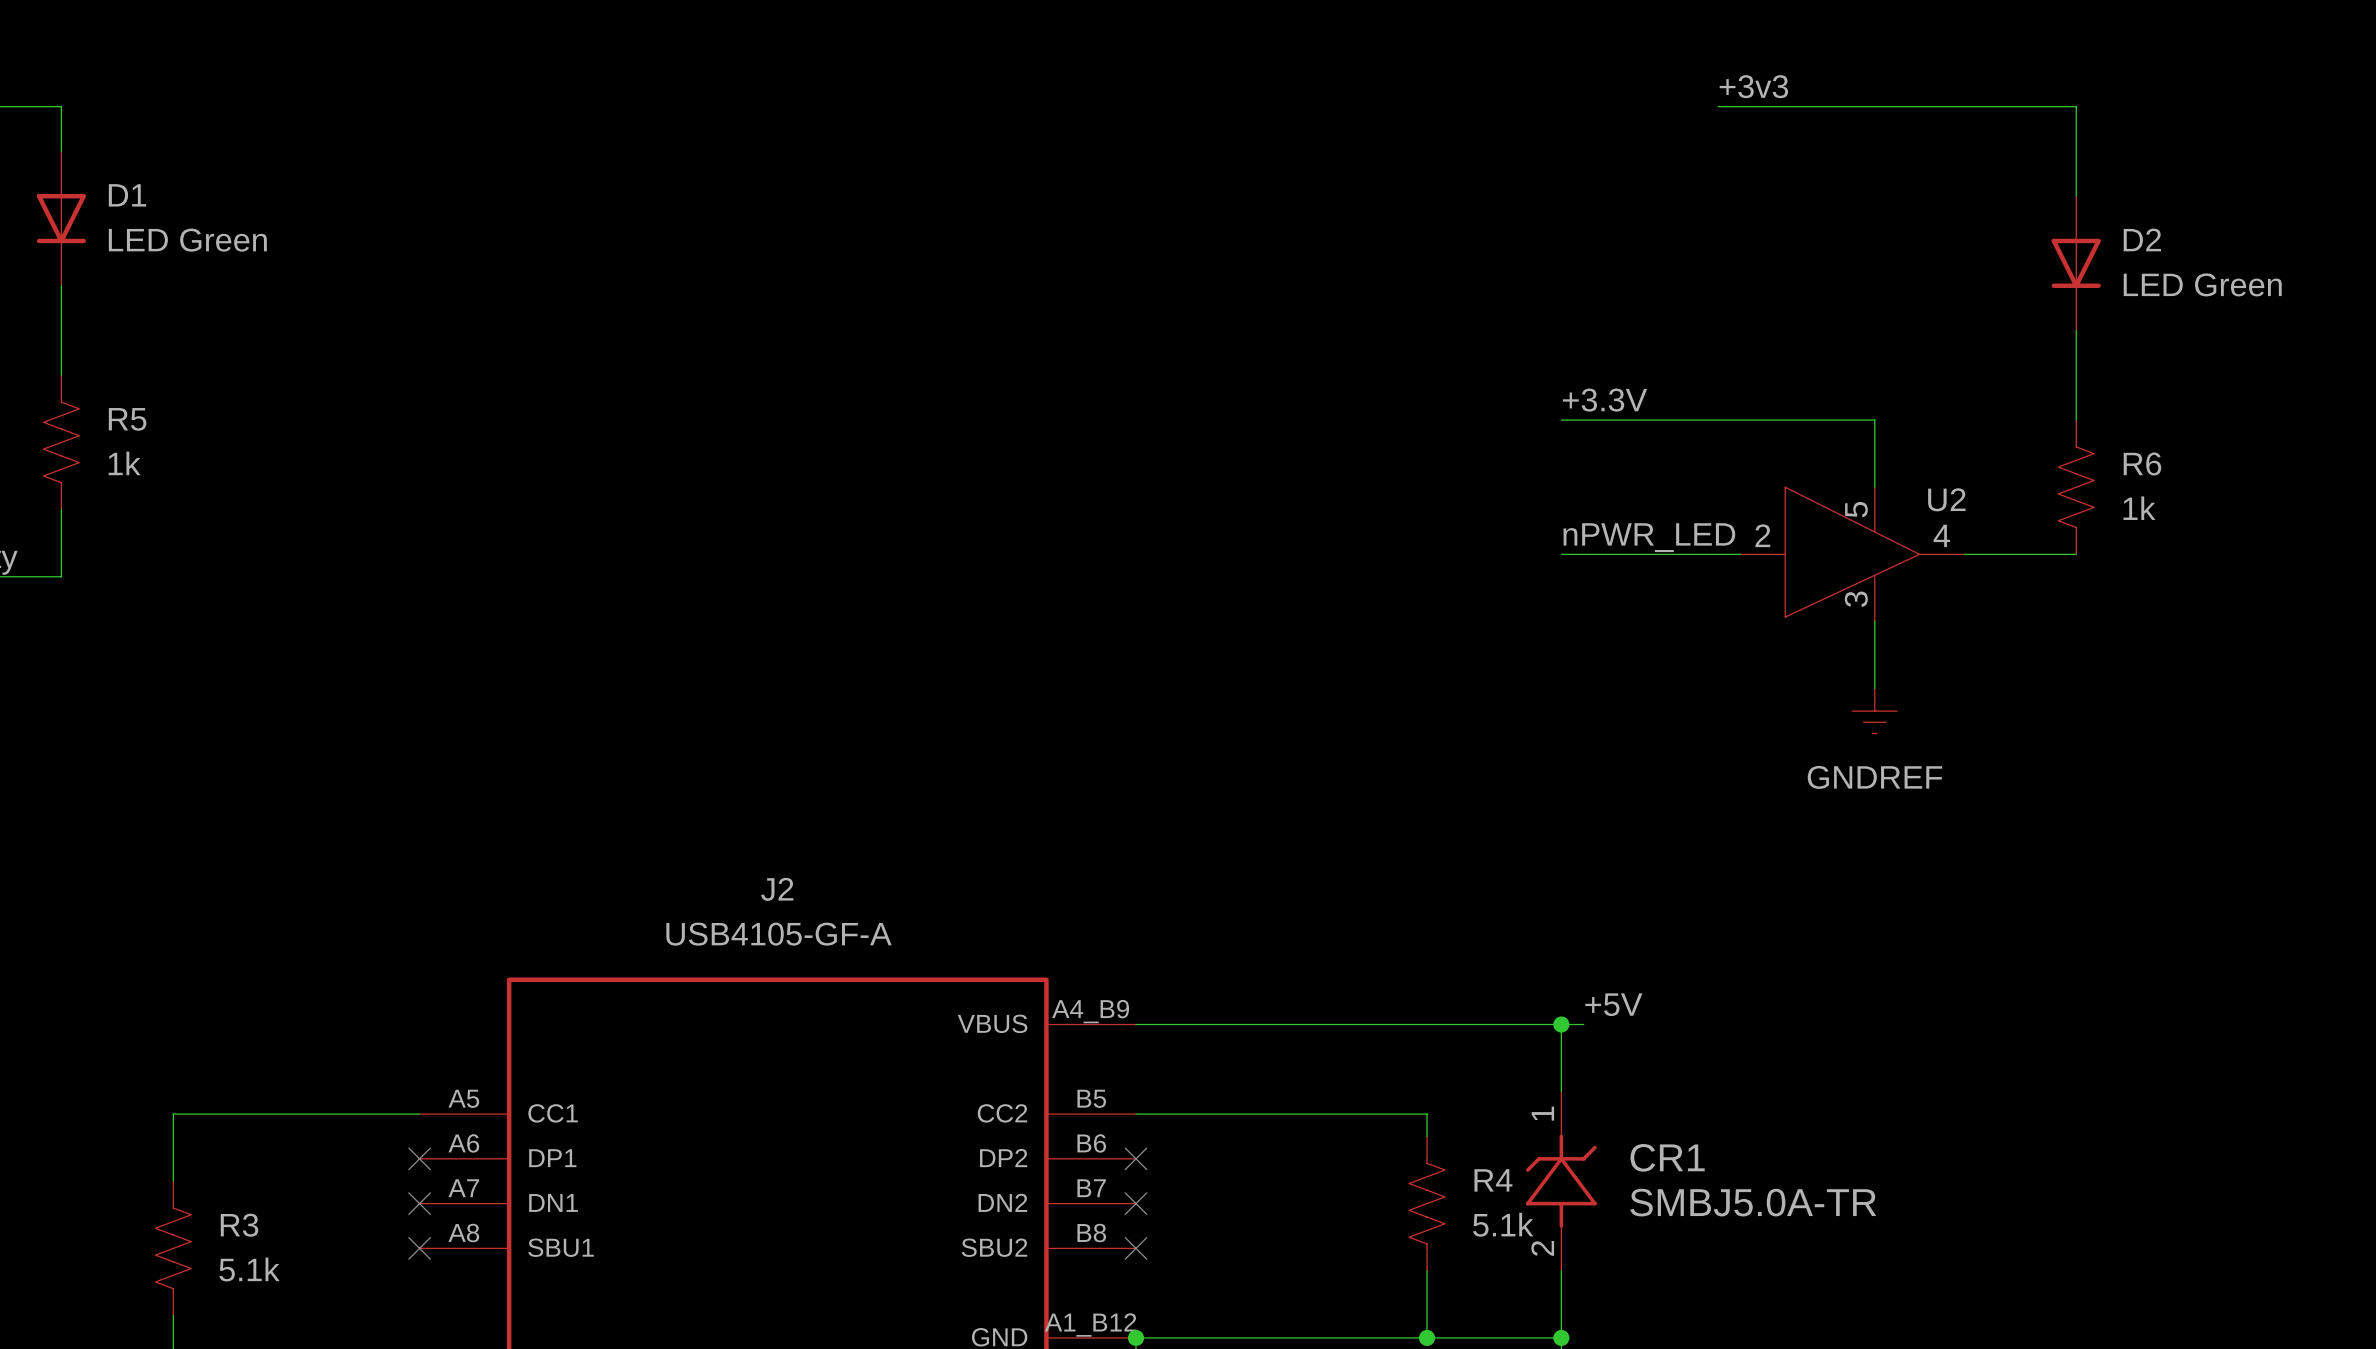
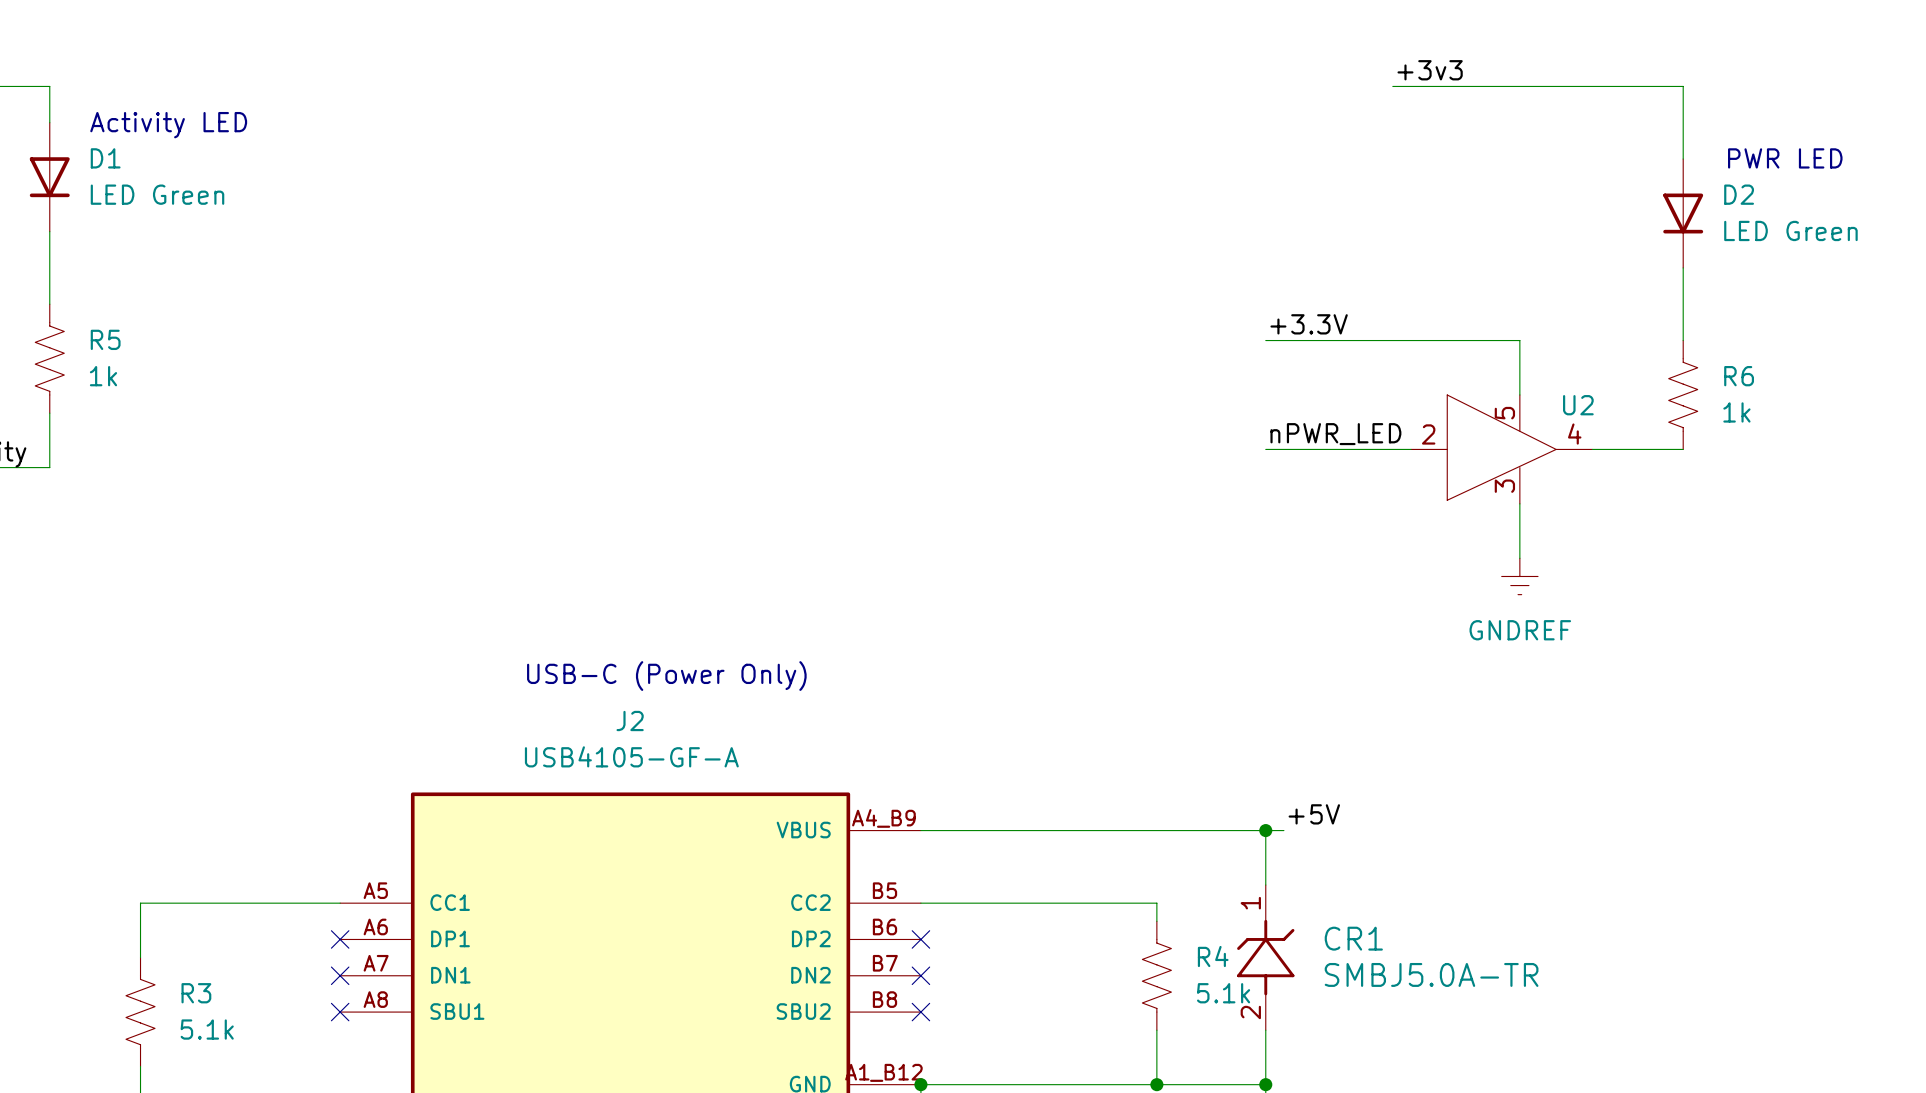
text: none -> Activity LED (168, 125)
text: none -> PWR LED (1785, 158)
text: none -> USB-C (Power Only) (666, 676)

